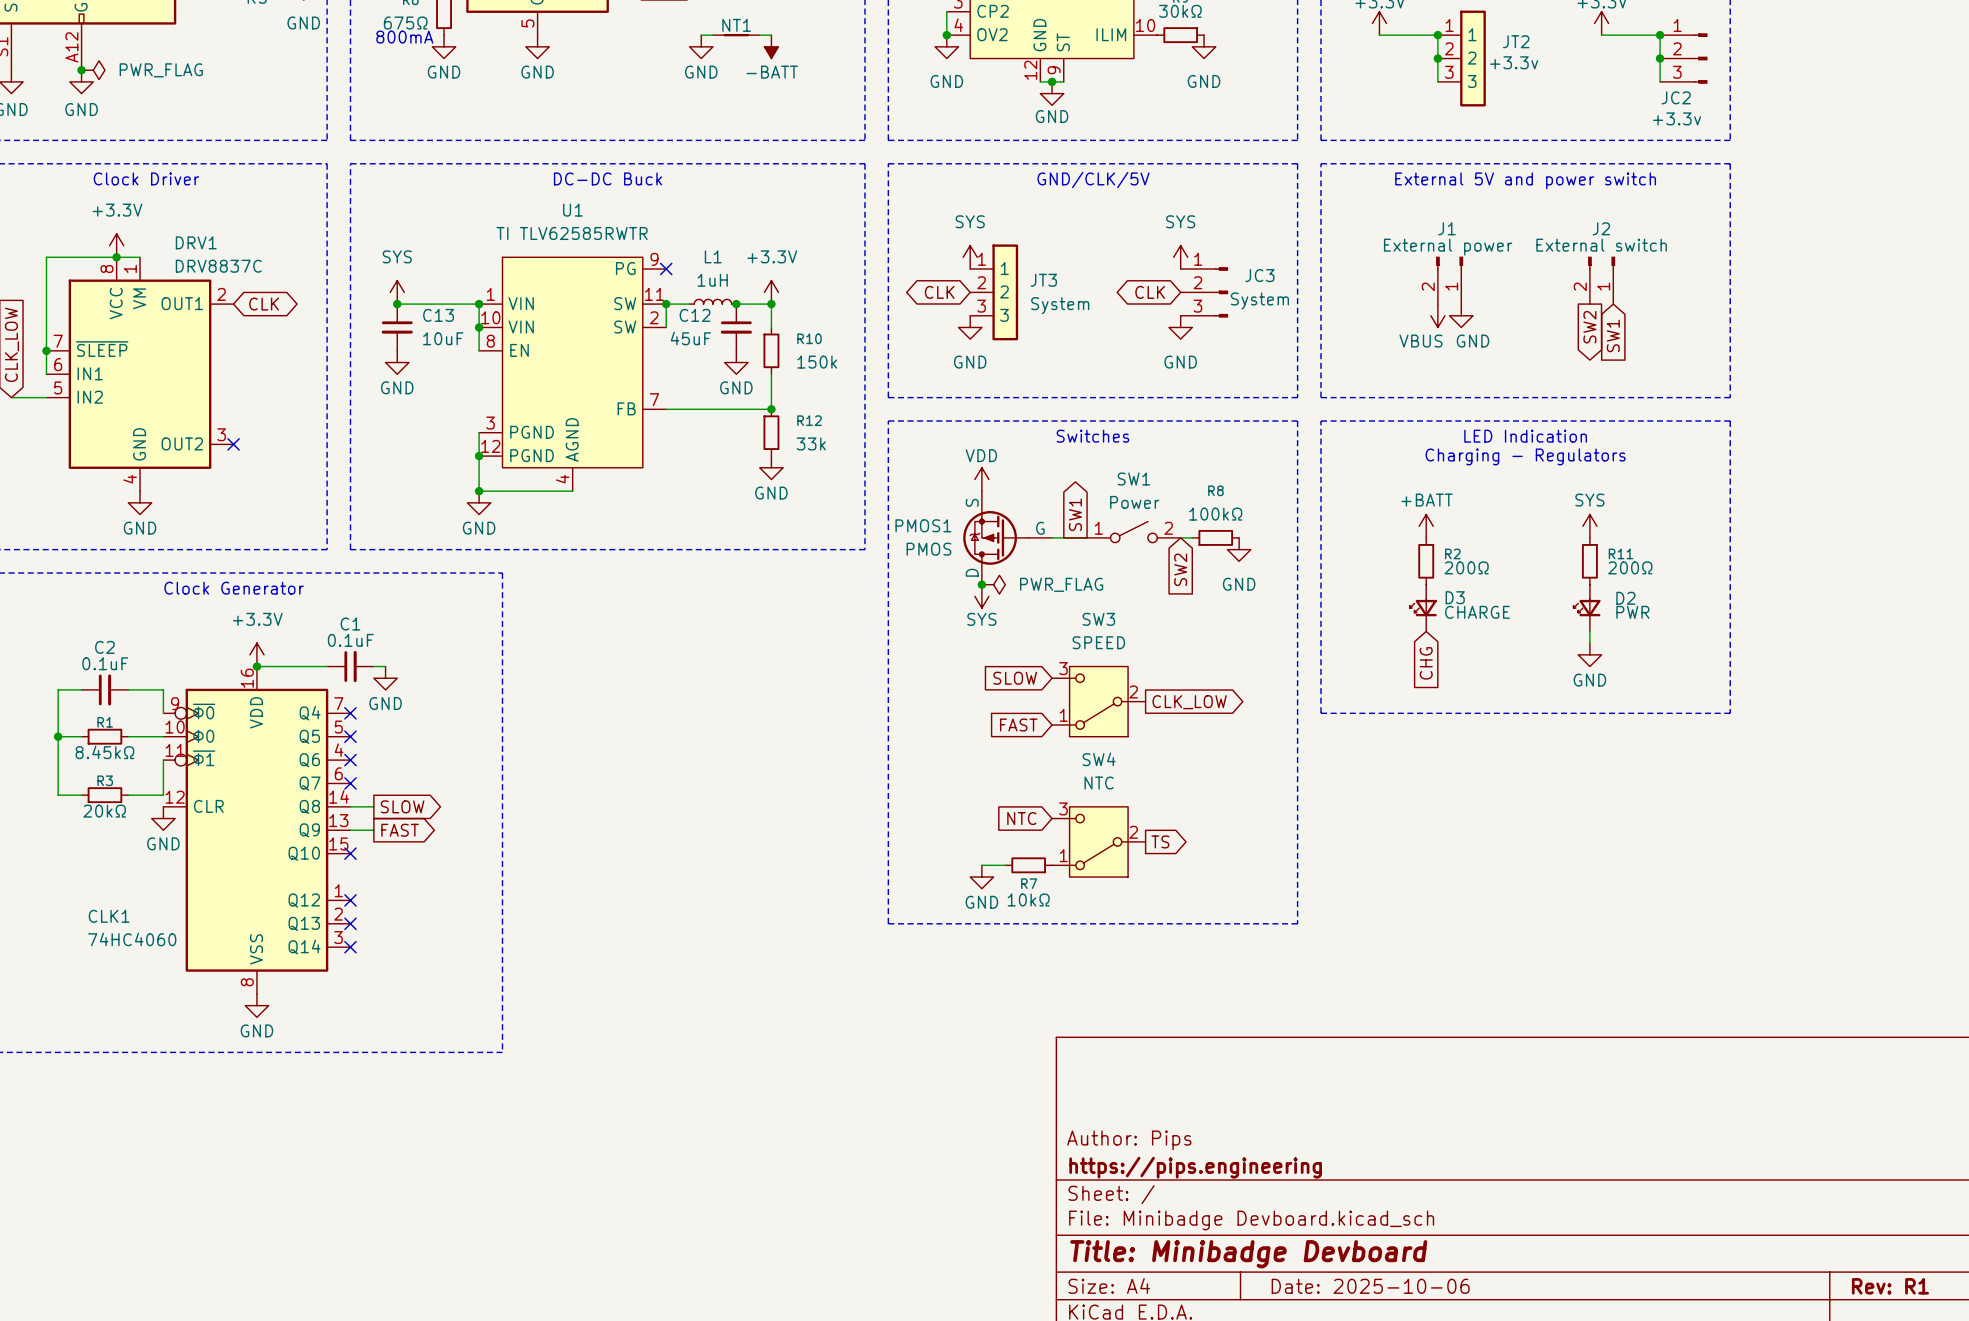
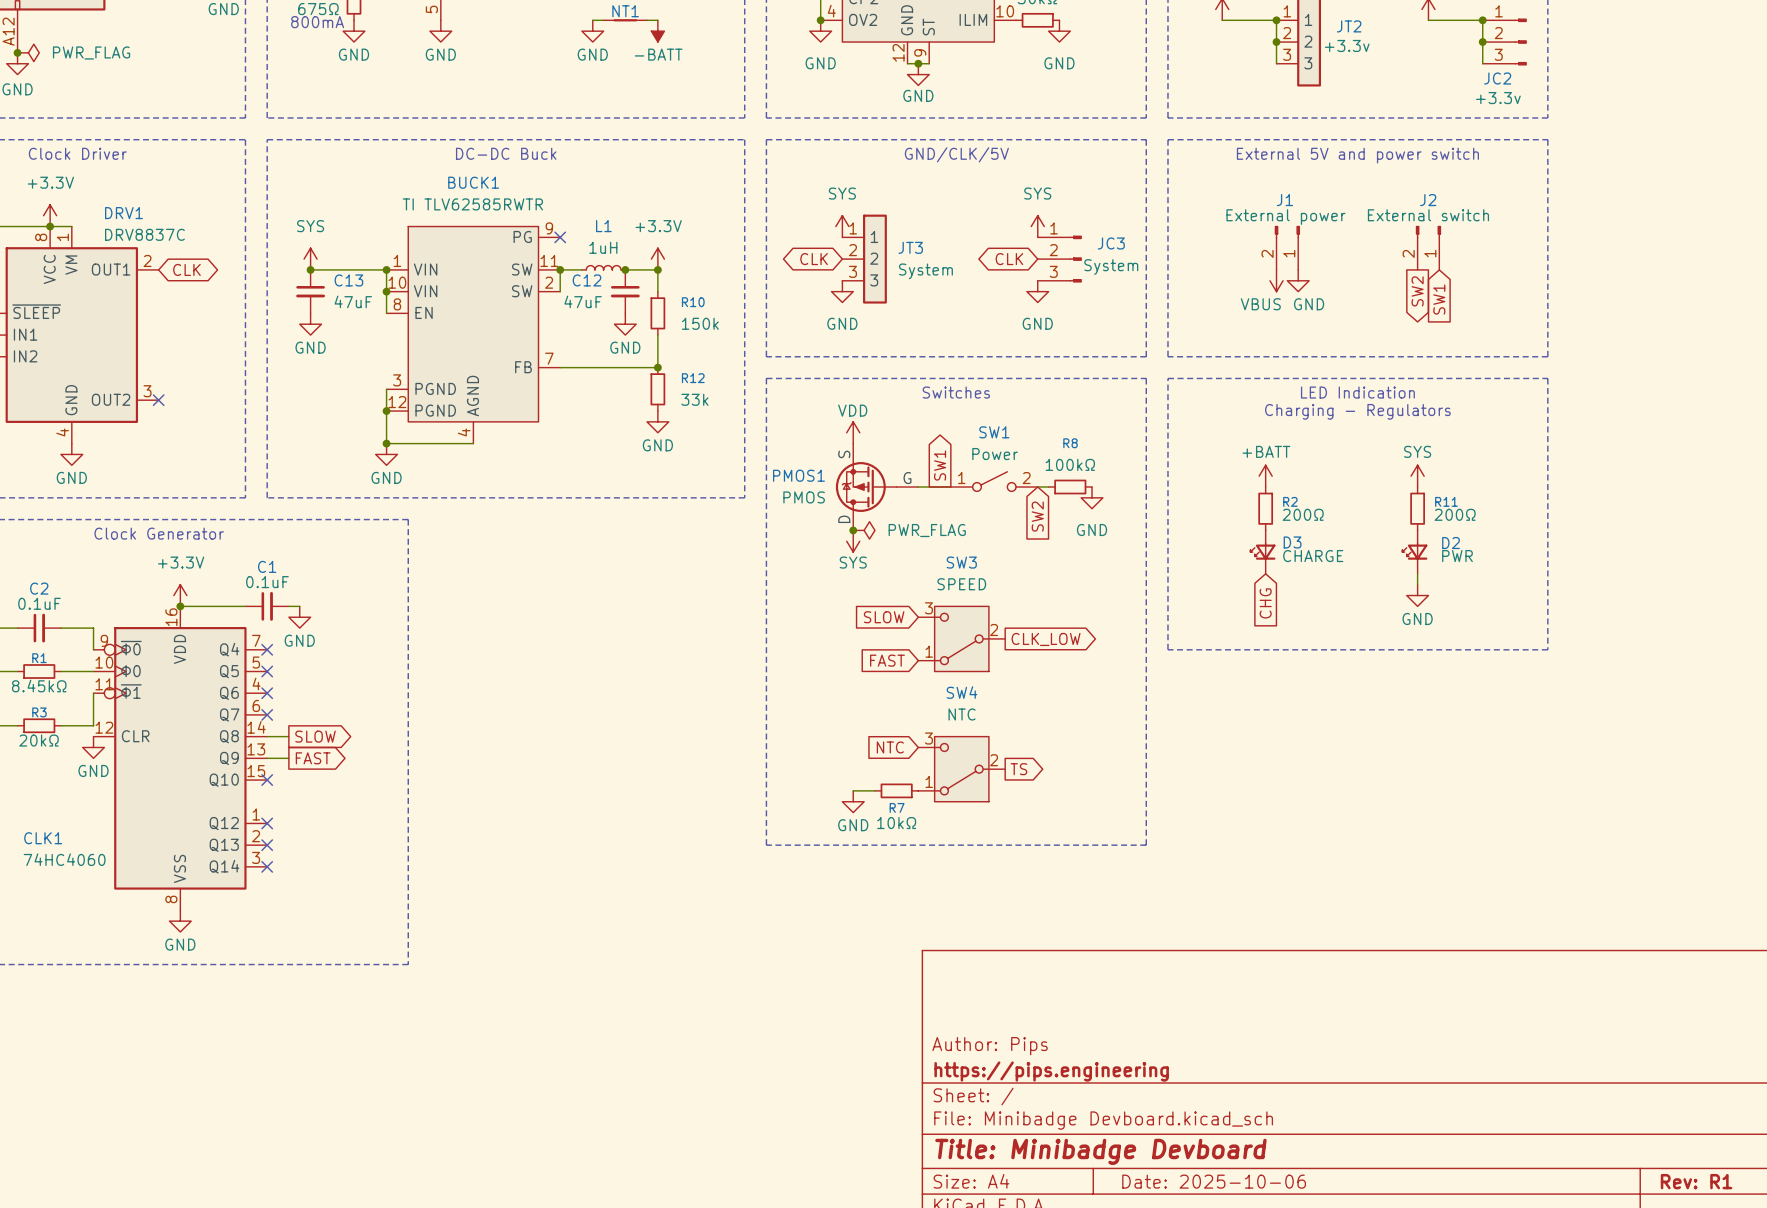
U1 name: U1 (572, 210) -> BUCK1 (473, 182)
C13 value: 10uF (443, 338) -> 47uF (353, 301)
C12 value: 45uF (690, 338) -> 47uF (583, 301)

